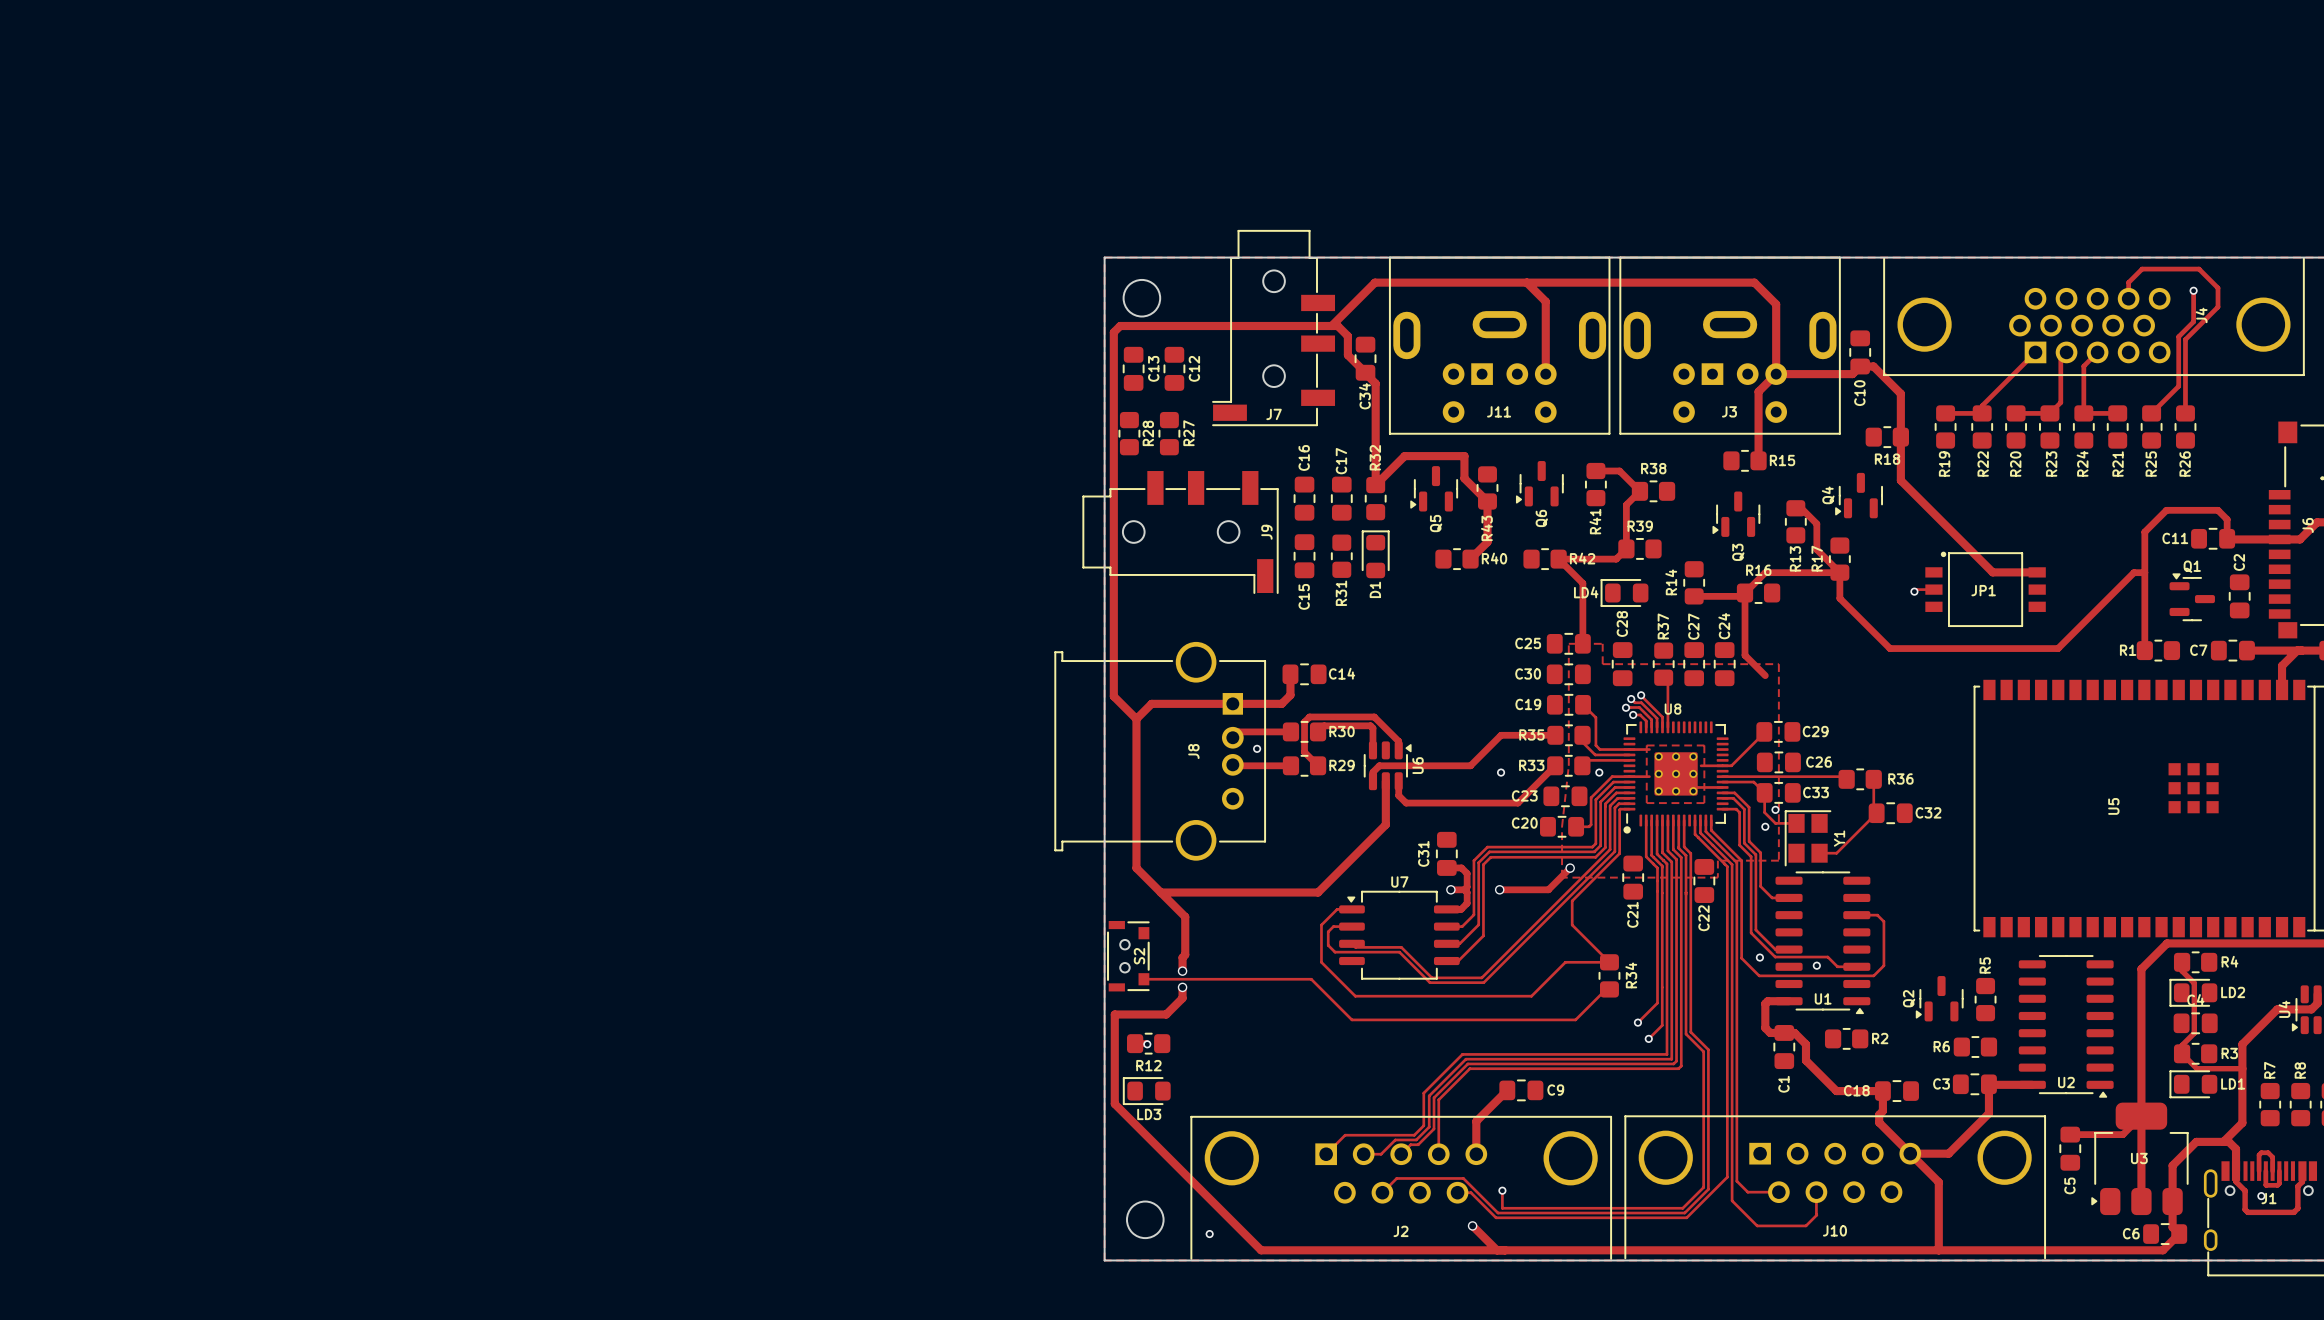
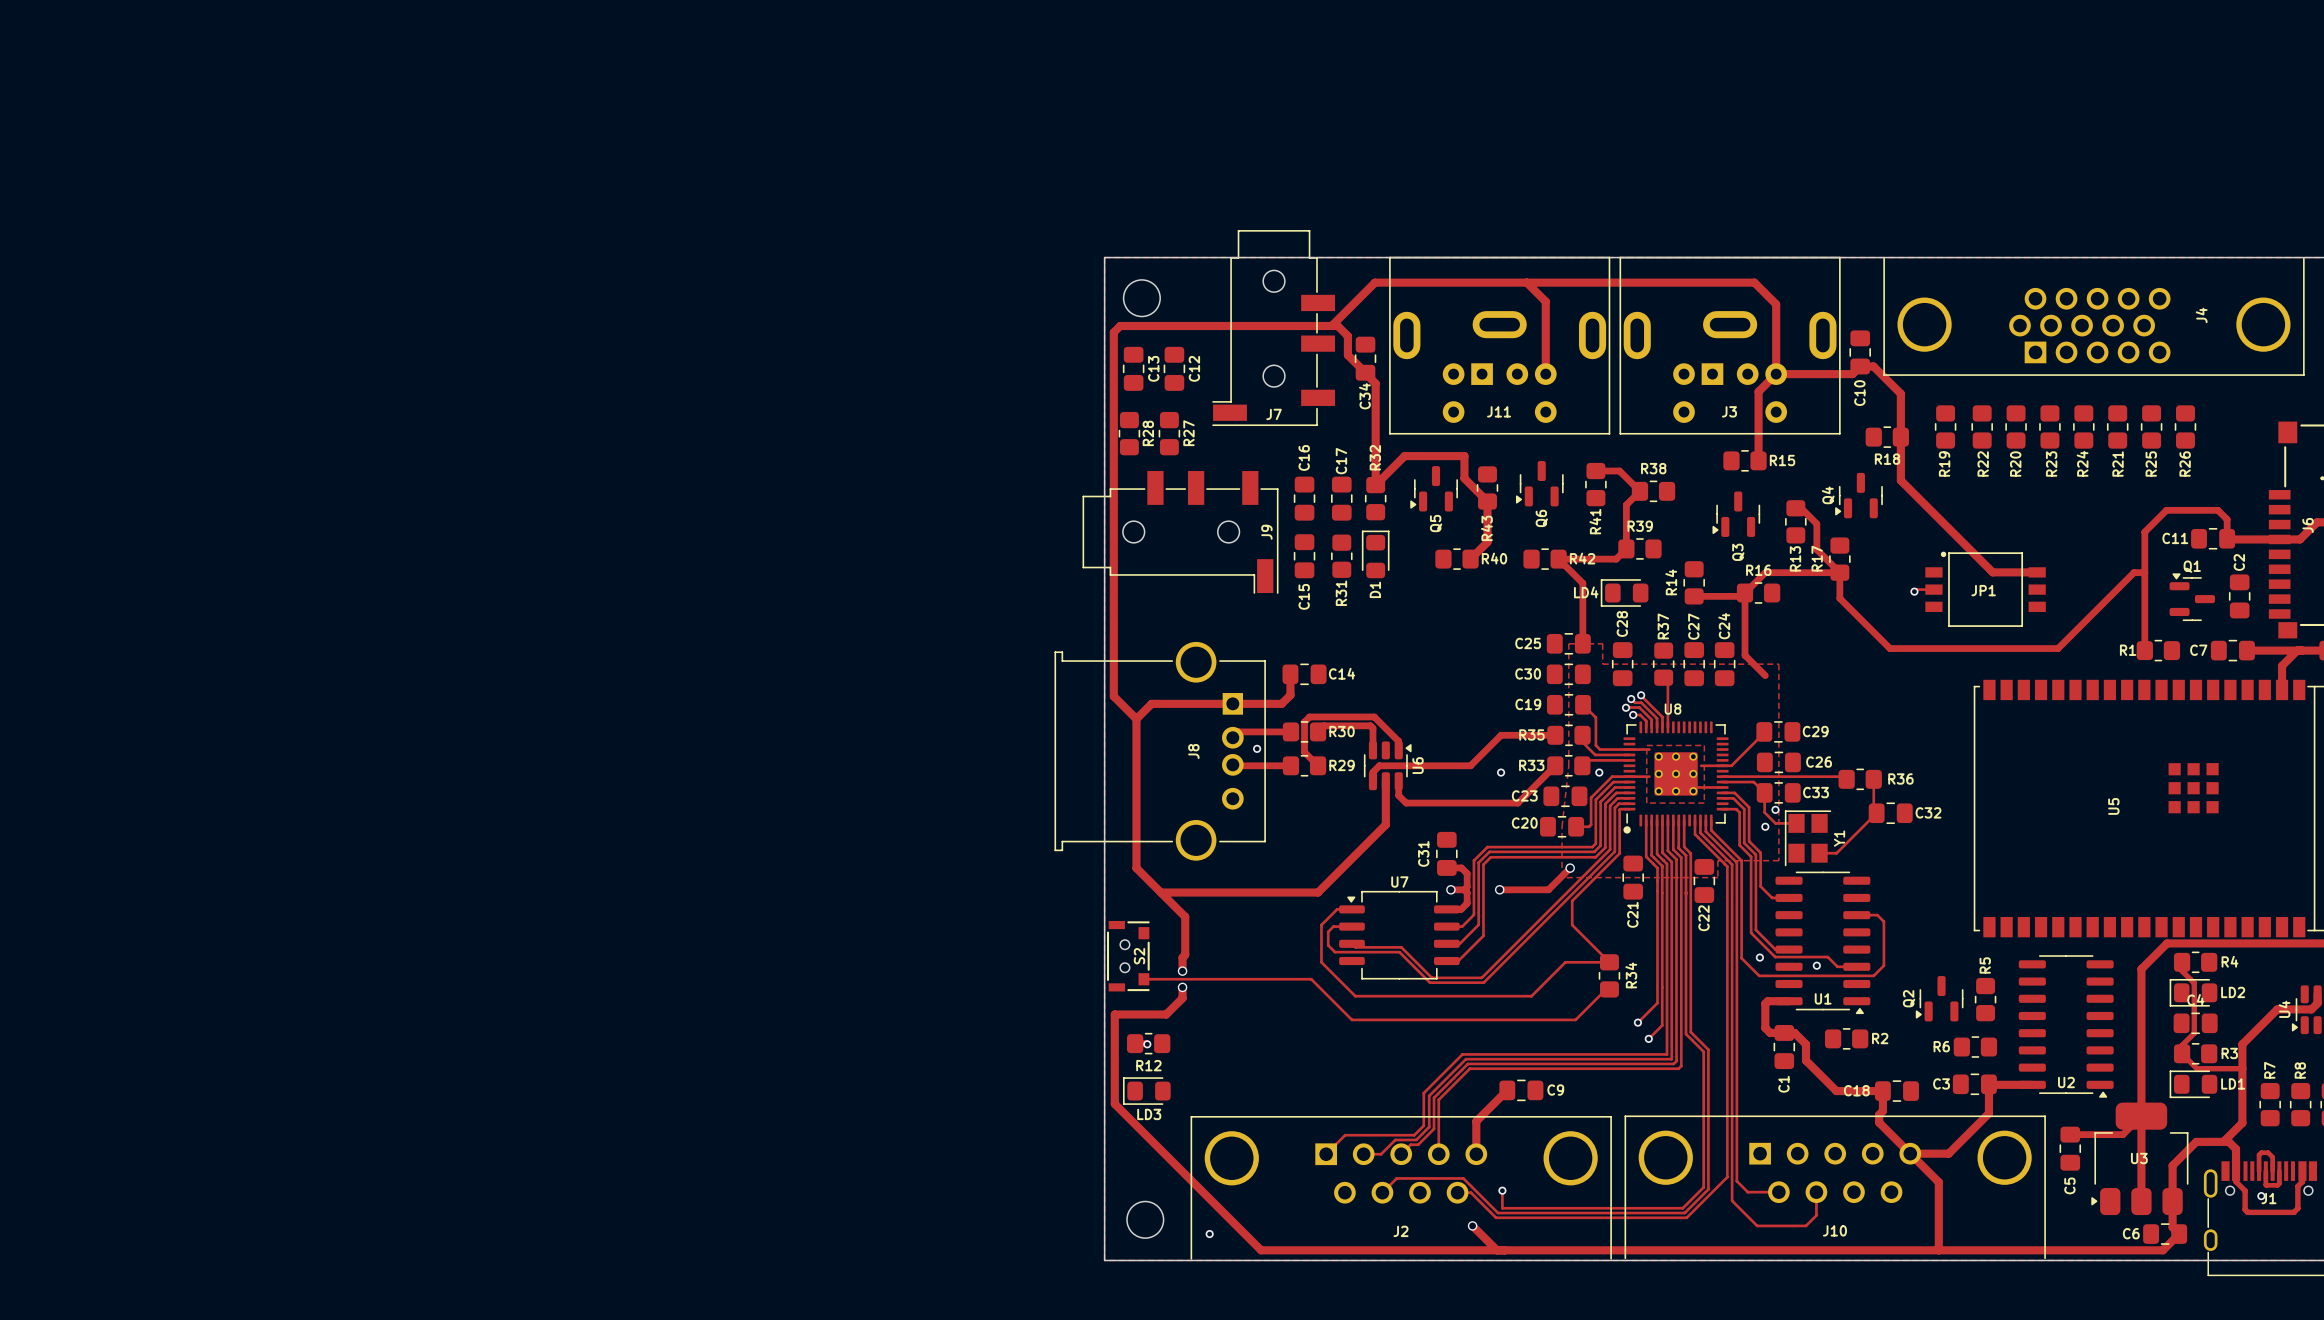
track: (2193, 290) (2193, 321) (2178, 336) (2178, 386) (2151, 413) -> none
via: (2193, 290) -> none
track: (2128, 298) (2128, 282) (2142, 269) (2199, 269) (2218, 288) (2218, 307) (2185, 339) (2185, 413) -> none
track: (2035, 352) (1982, 405) (1982, 413) (1945, 413) -> none
track: (2066, 352) (2060, 358) (2060, 402) (2049, 413) (2016, 413) -> none
track: (2097, 352) (2083, 366) (2083, 413) (2117, 413) -> none

